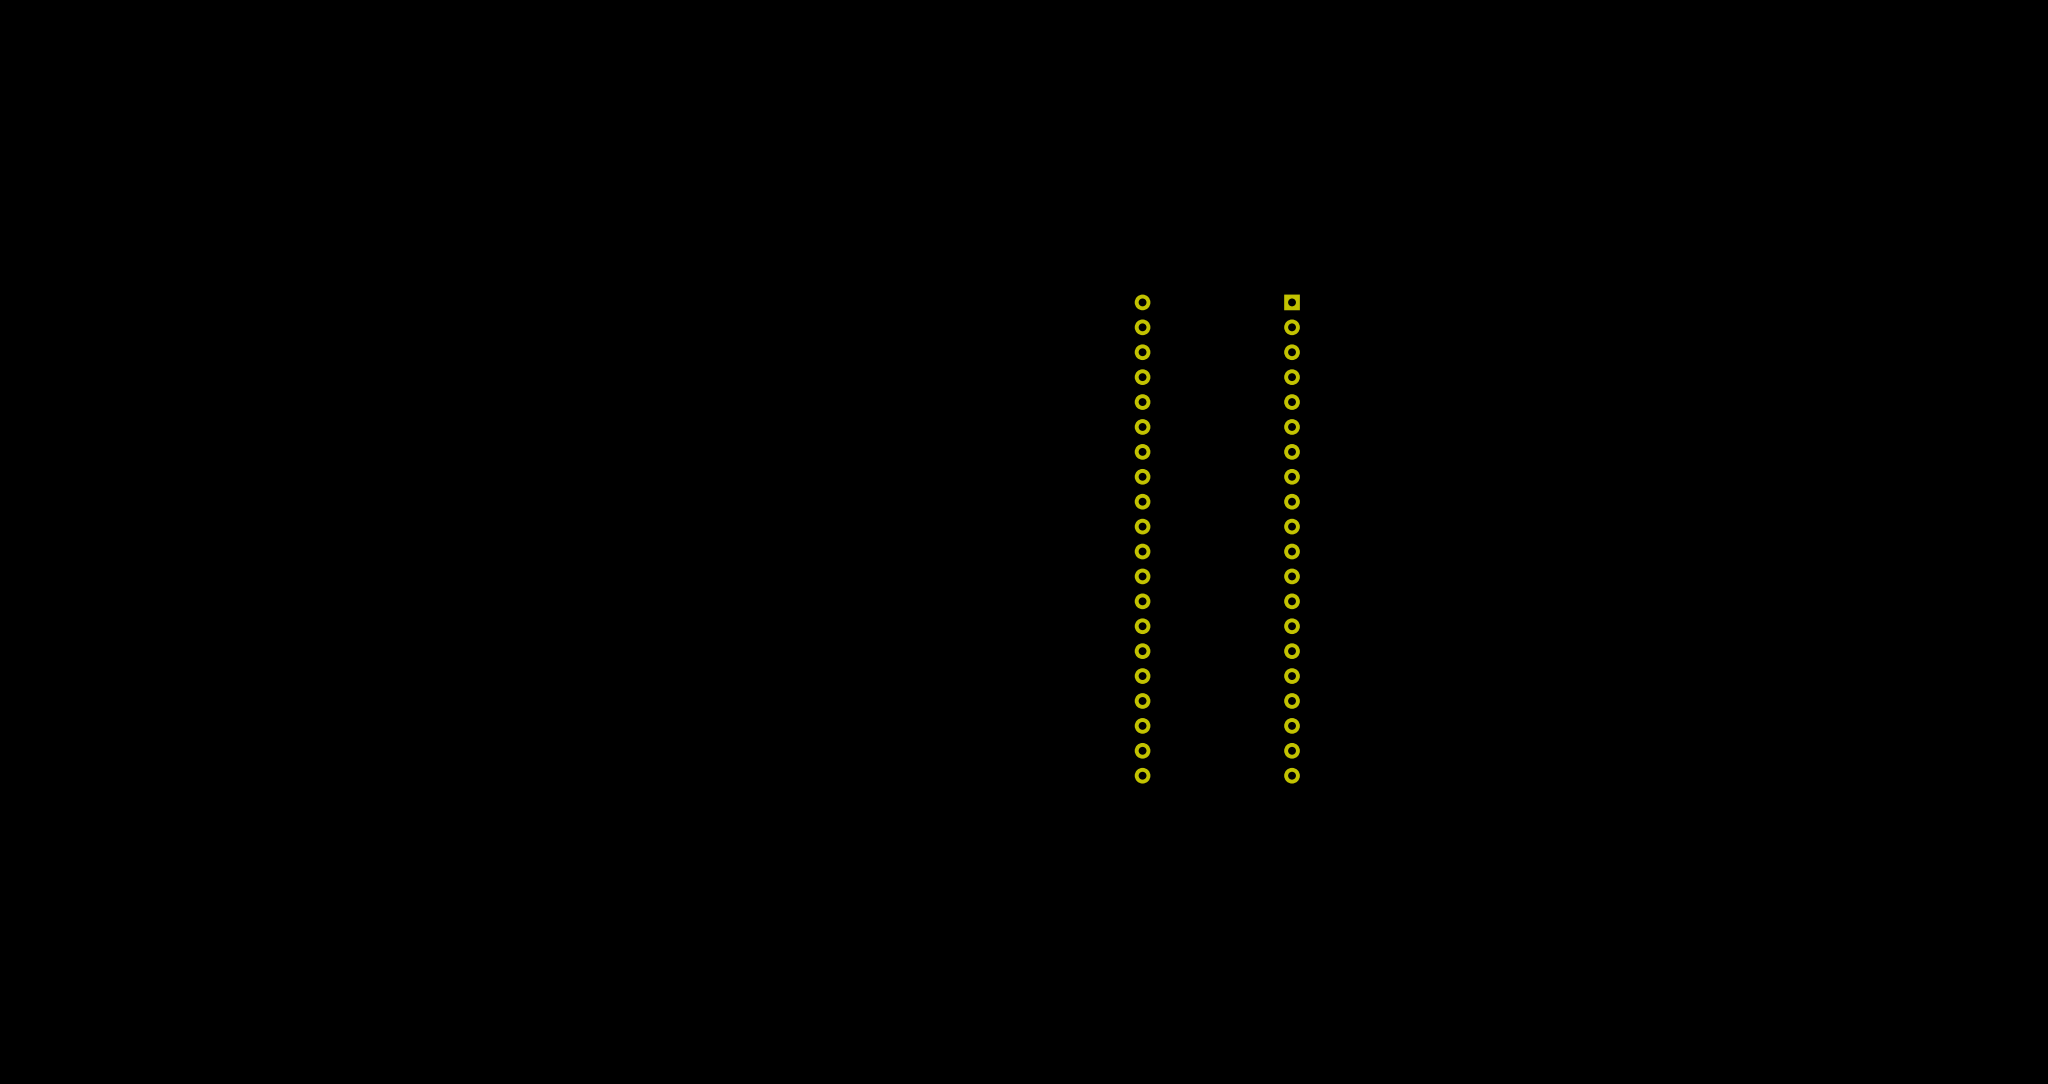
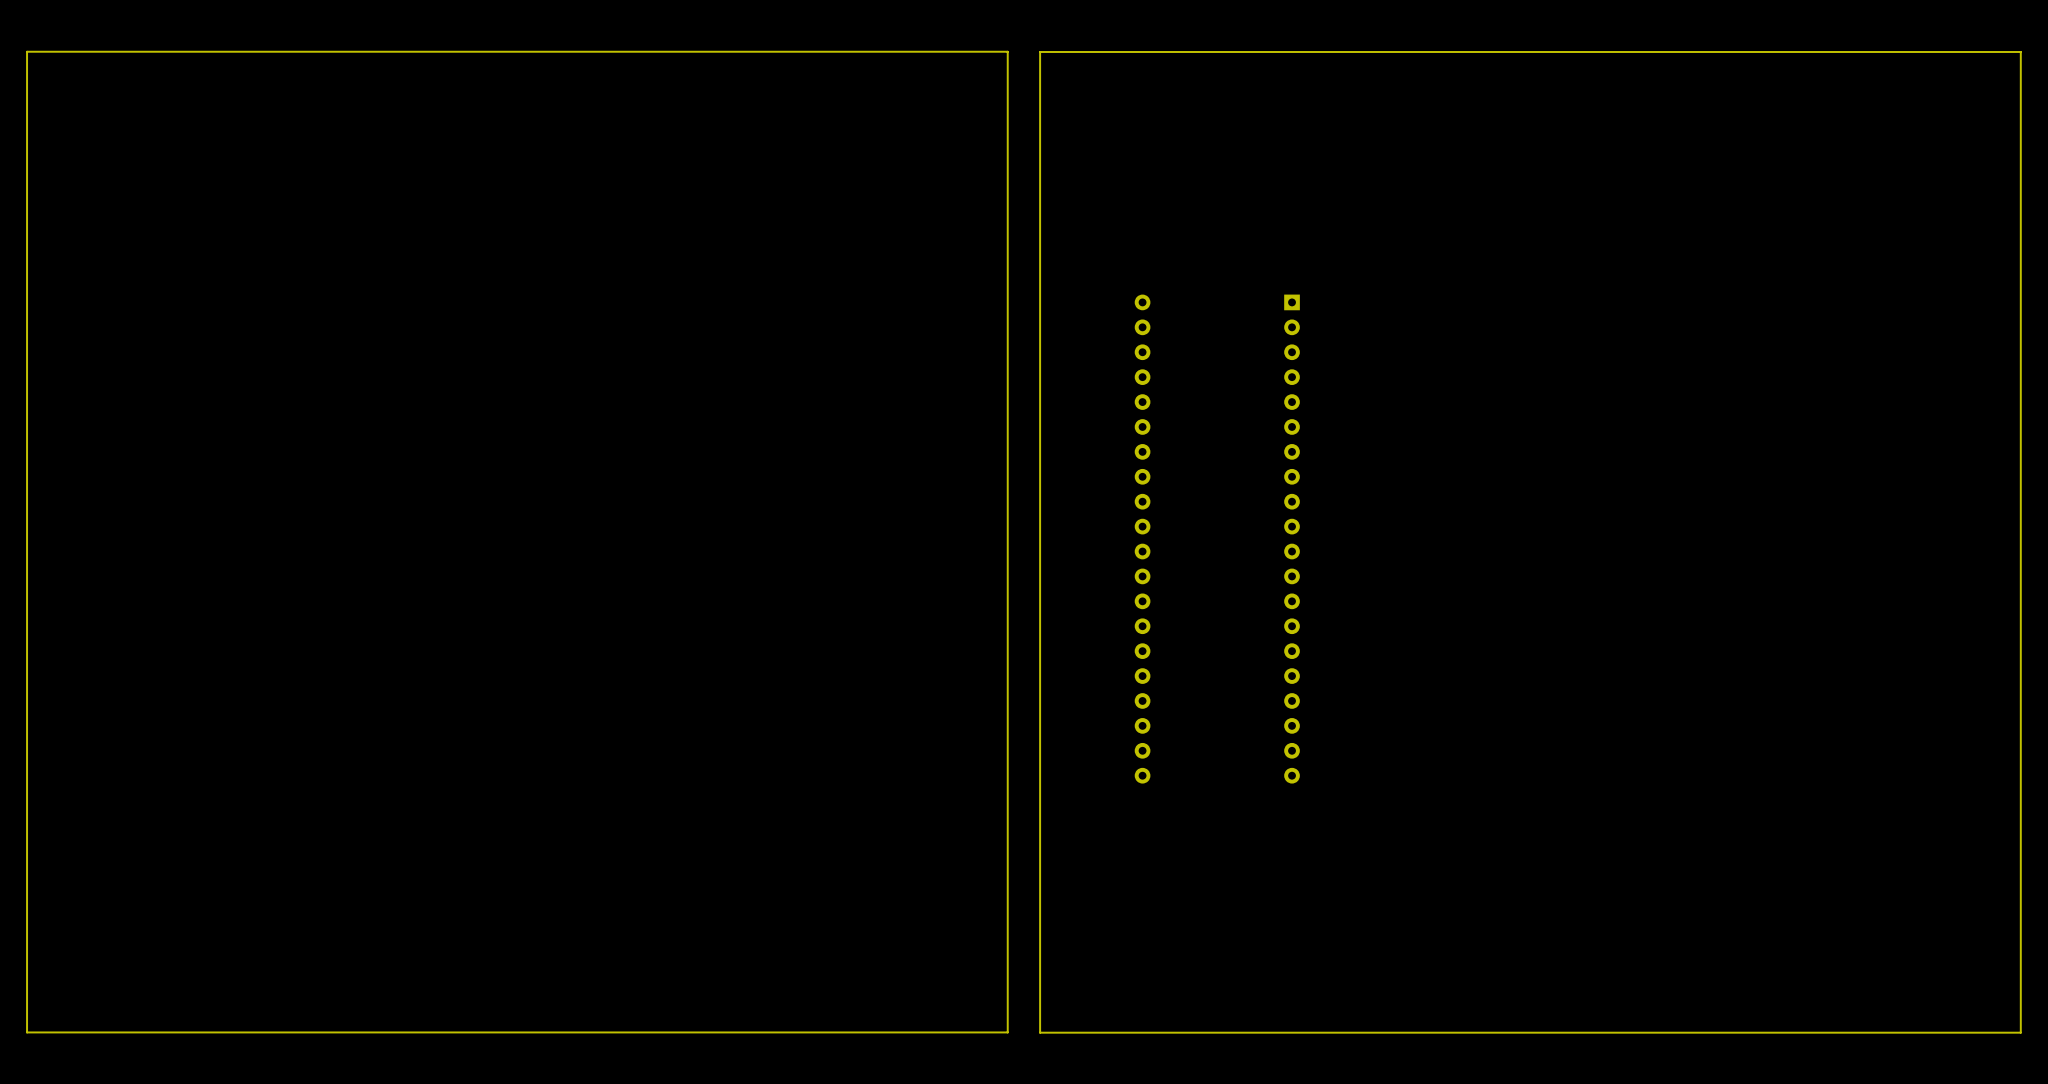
board edge: none -> (1007, 51) (27, 51) (27, 1032) (1007, 1032) (1007, 51)
board edge: none -> (2020, 51) (1040, 51) (1040, 1032) (2020, 1032) (2020, 51)

